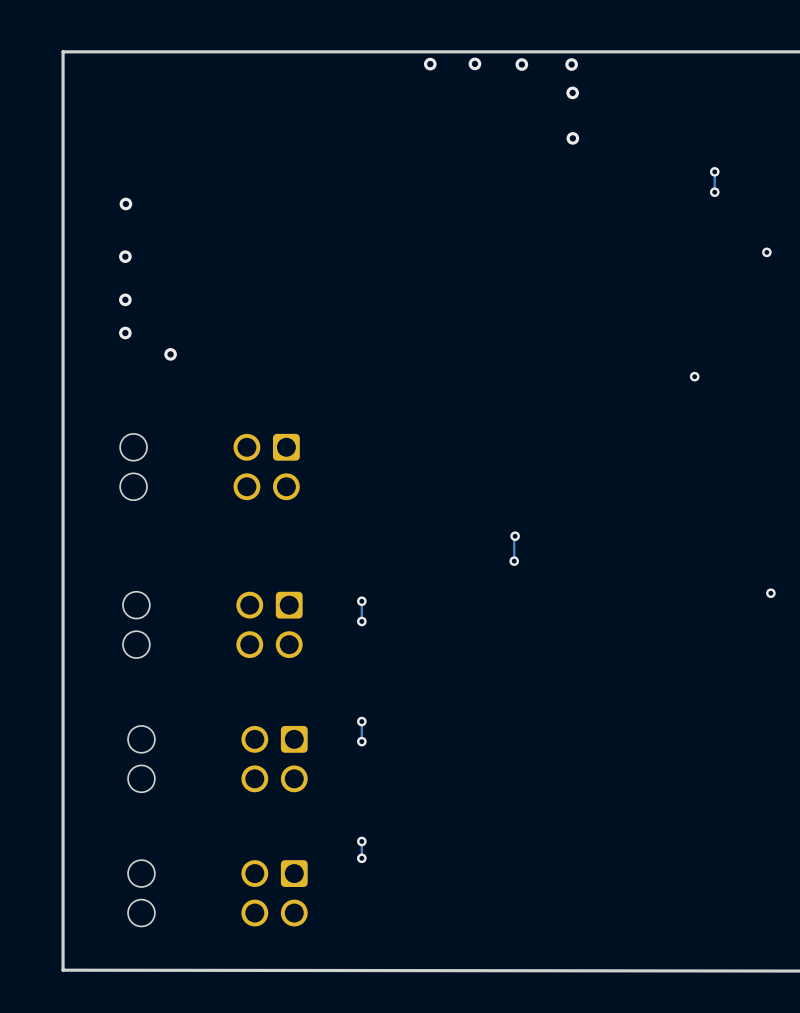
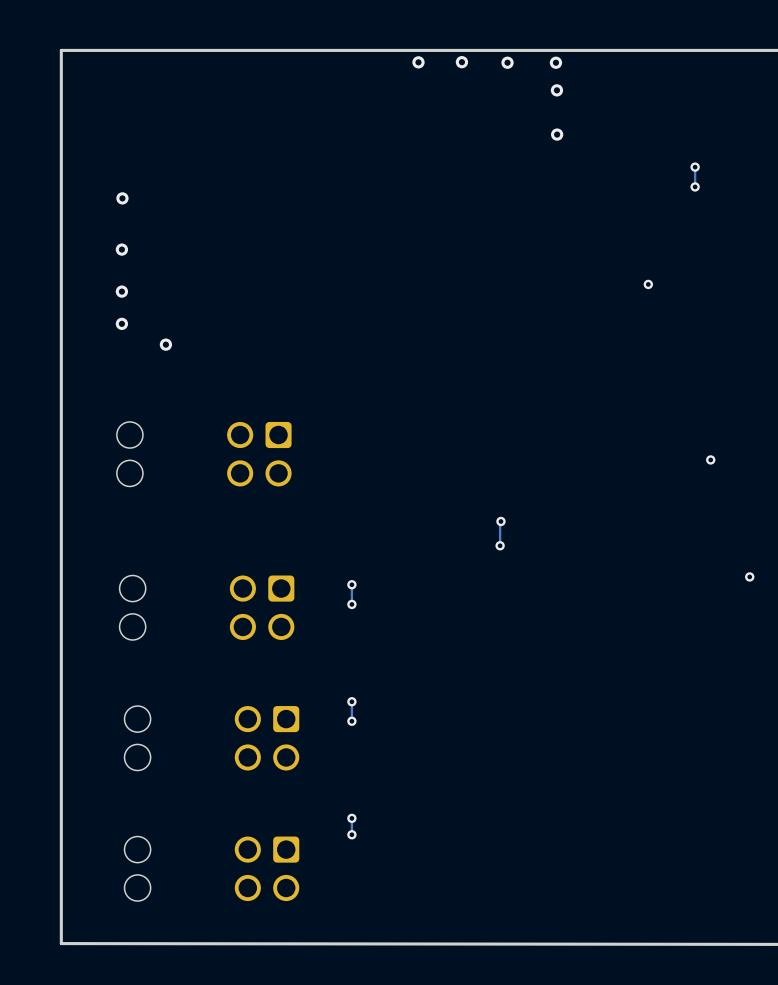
via: (766, 252) -> none
via: none -> (648, 284)
via: (694, 376) -> none
via: none -> (710, 459)

